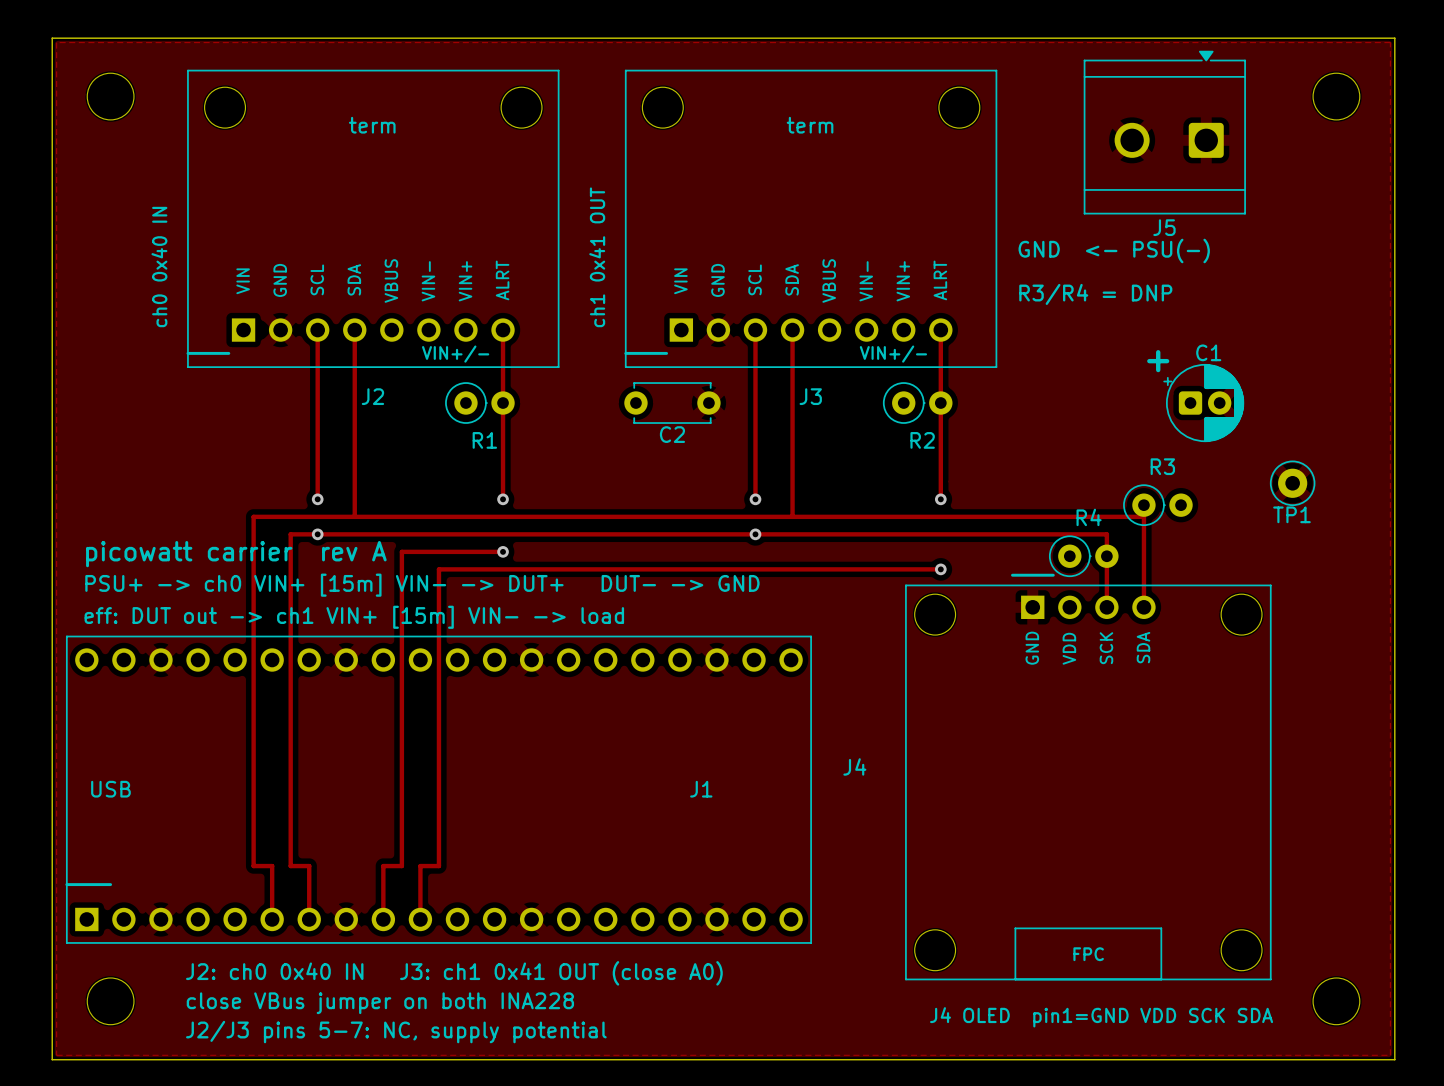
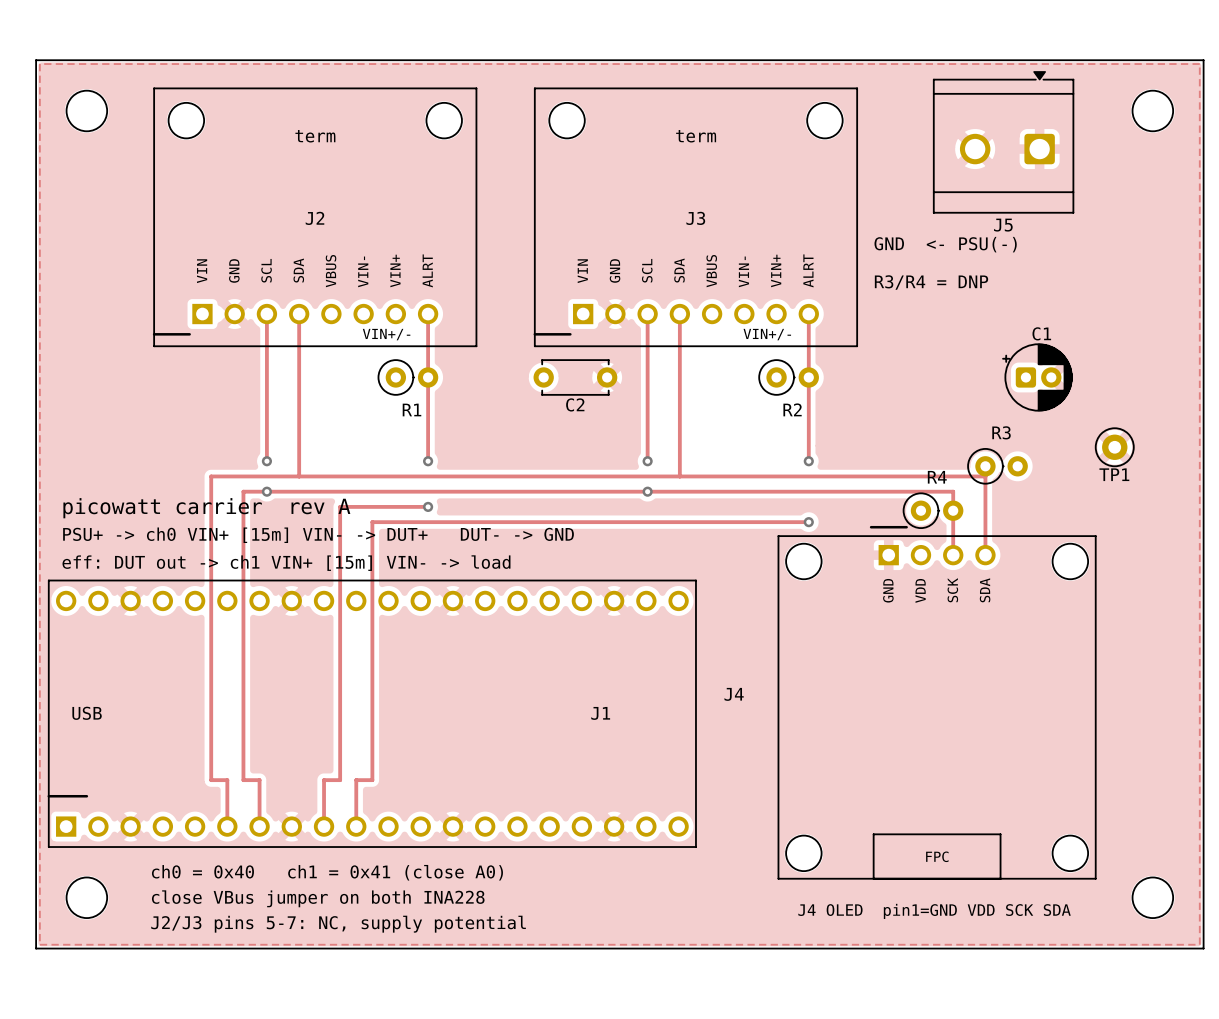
text: ch1 0x41 OUT (597, 257) -> none
text: ch0 0x40 IN (159, 267) -> none
text: + (1158, 361) -> none
J2 name position: J2 (372, 396) -> J2 (315, 218)
J3 name position: J3 (810, 396) -> J3 (695, 218)
text: J2: ch0 0x40 IN J3: ch1 0x41 OUT (close A0) (454, 973) -> ch0 = 0x40 ch1 = 0x41 (close A0) (327, 872)

